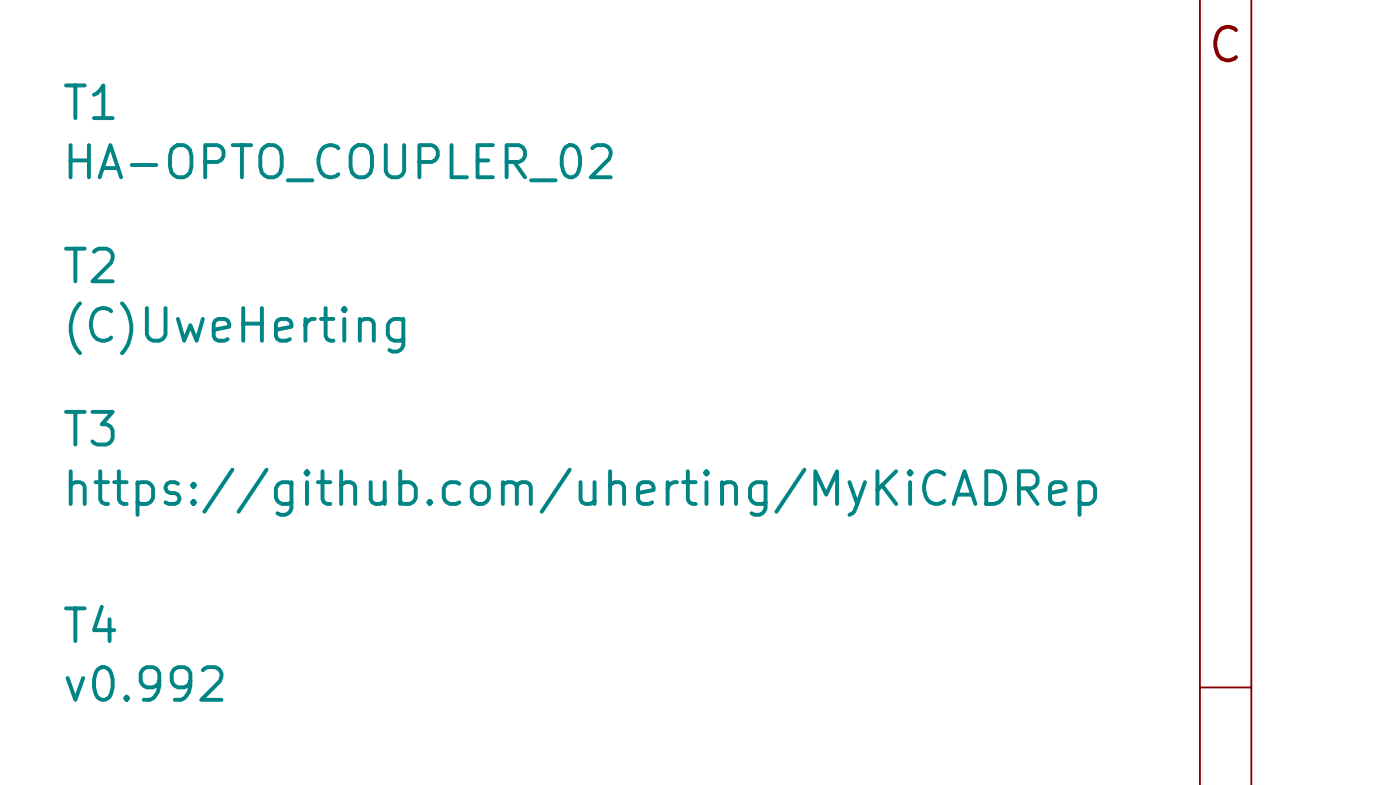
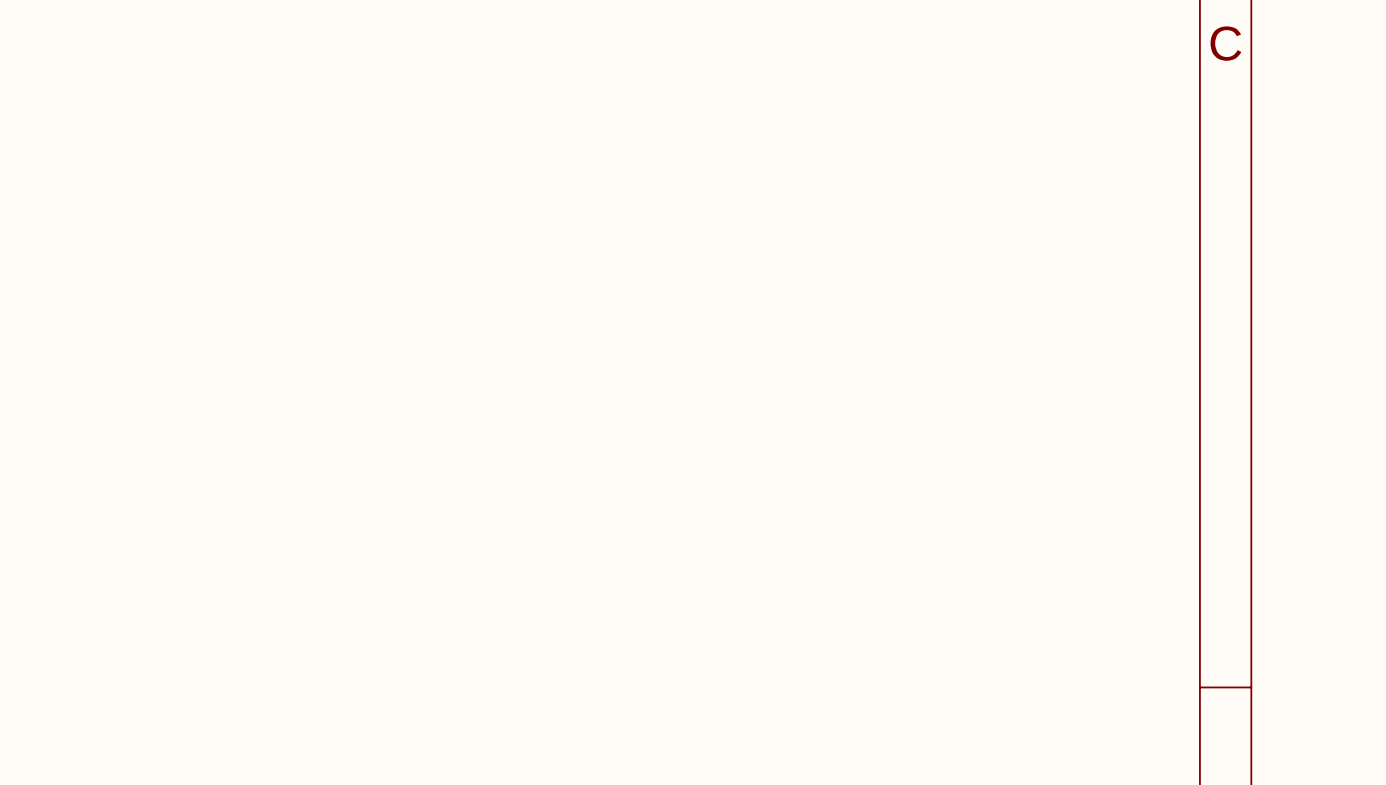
T1: HA-OPTO_COUPLER_02 (338, 132) -> none
T2: (C)UweHerting (234, 300) -> none
T3: https://github.com/uherting/MyKiCADRep (580, 463) -> none
T4: v0.992 (143, 653) -> none

